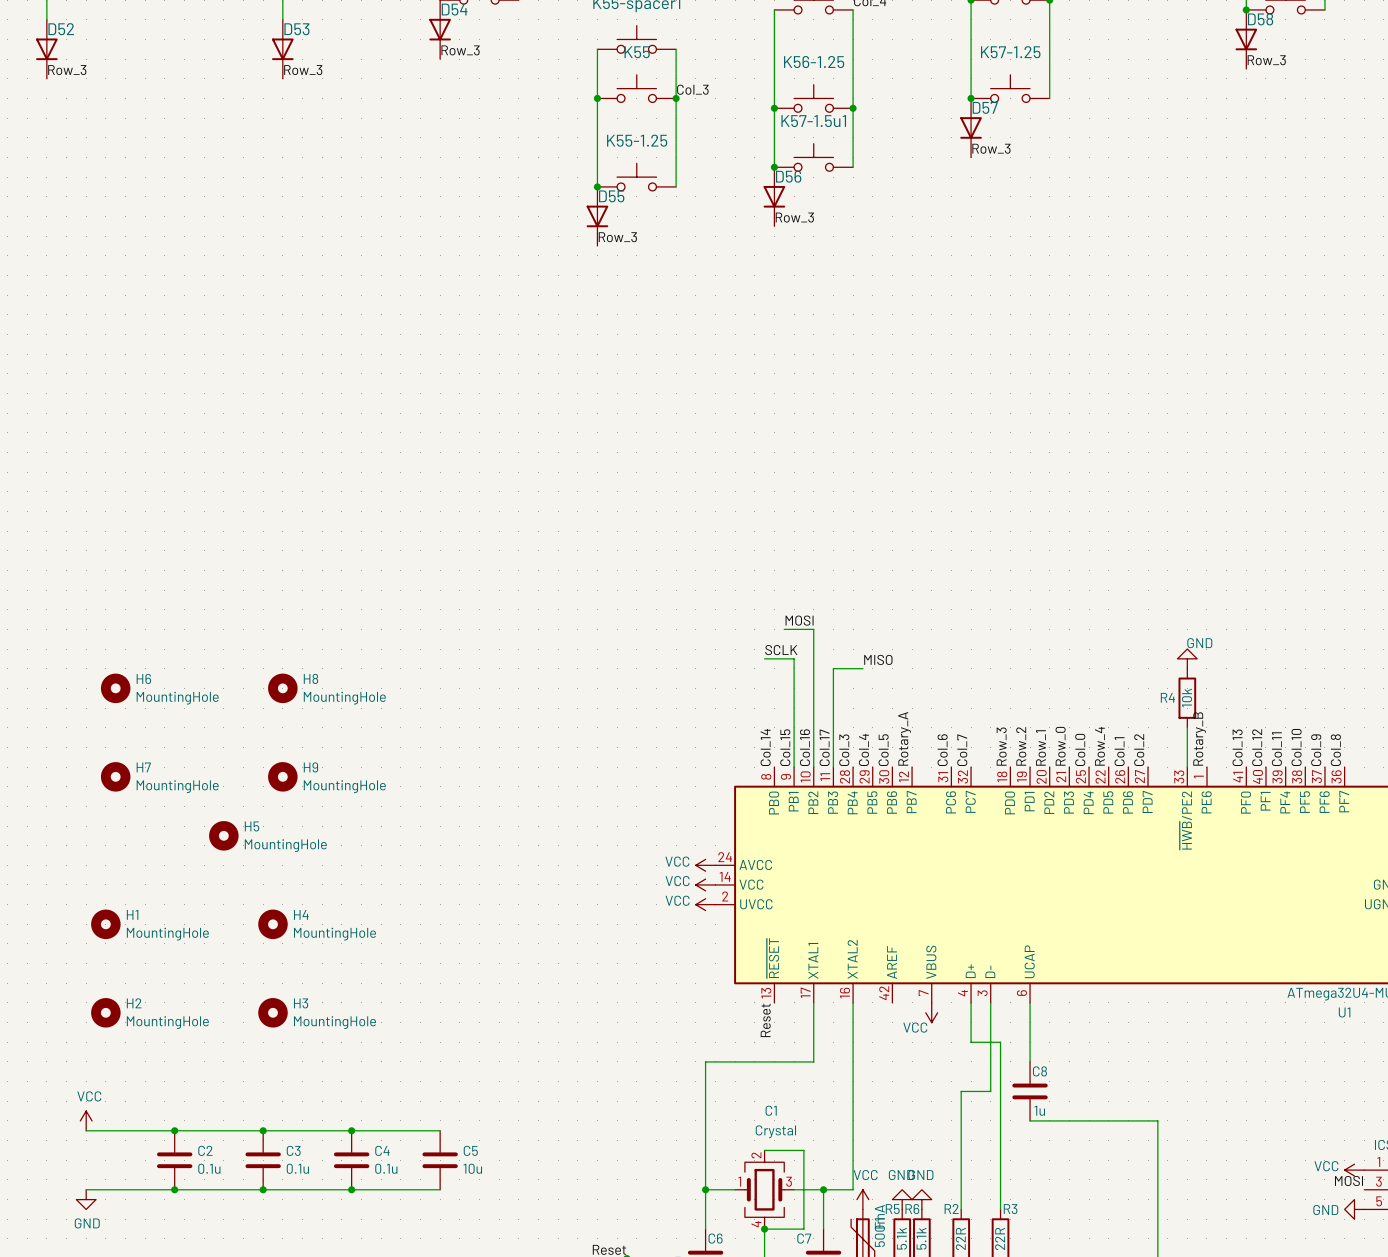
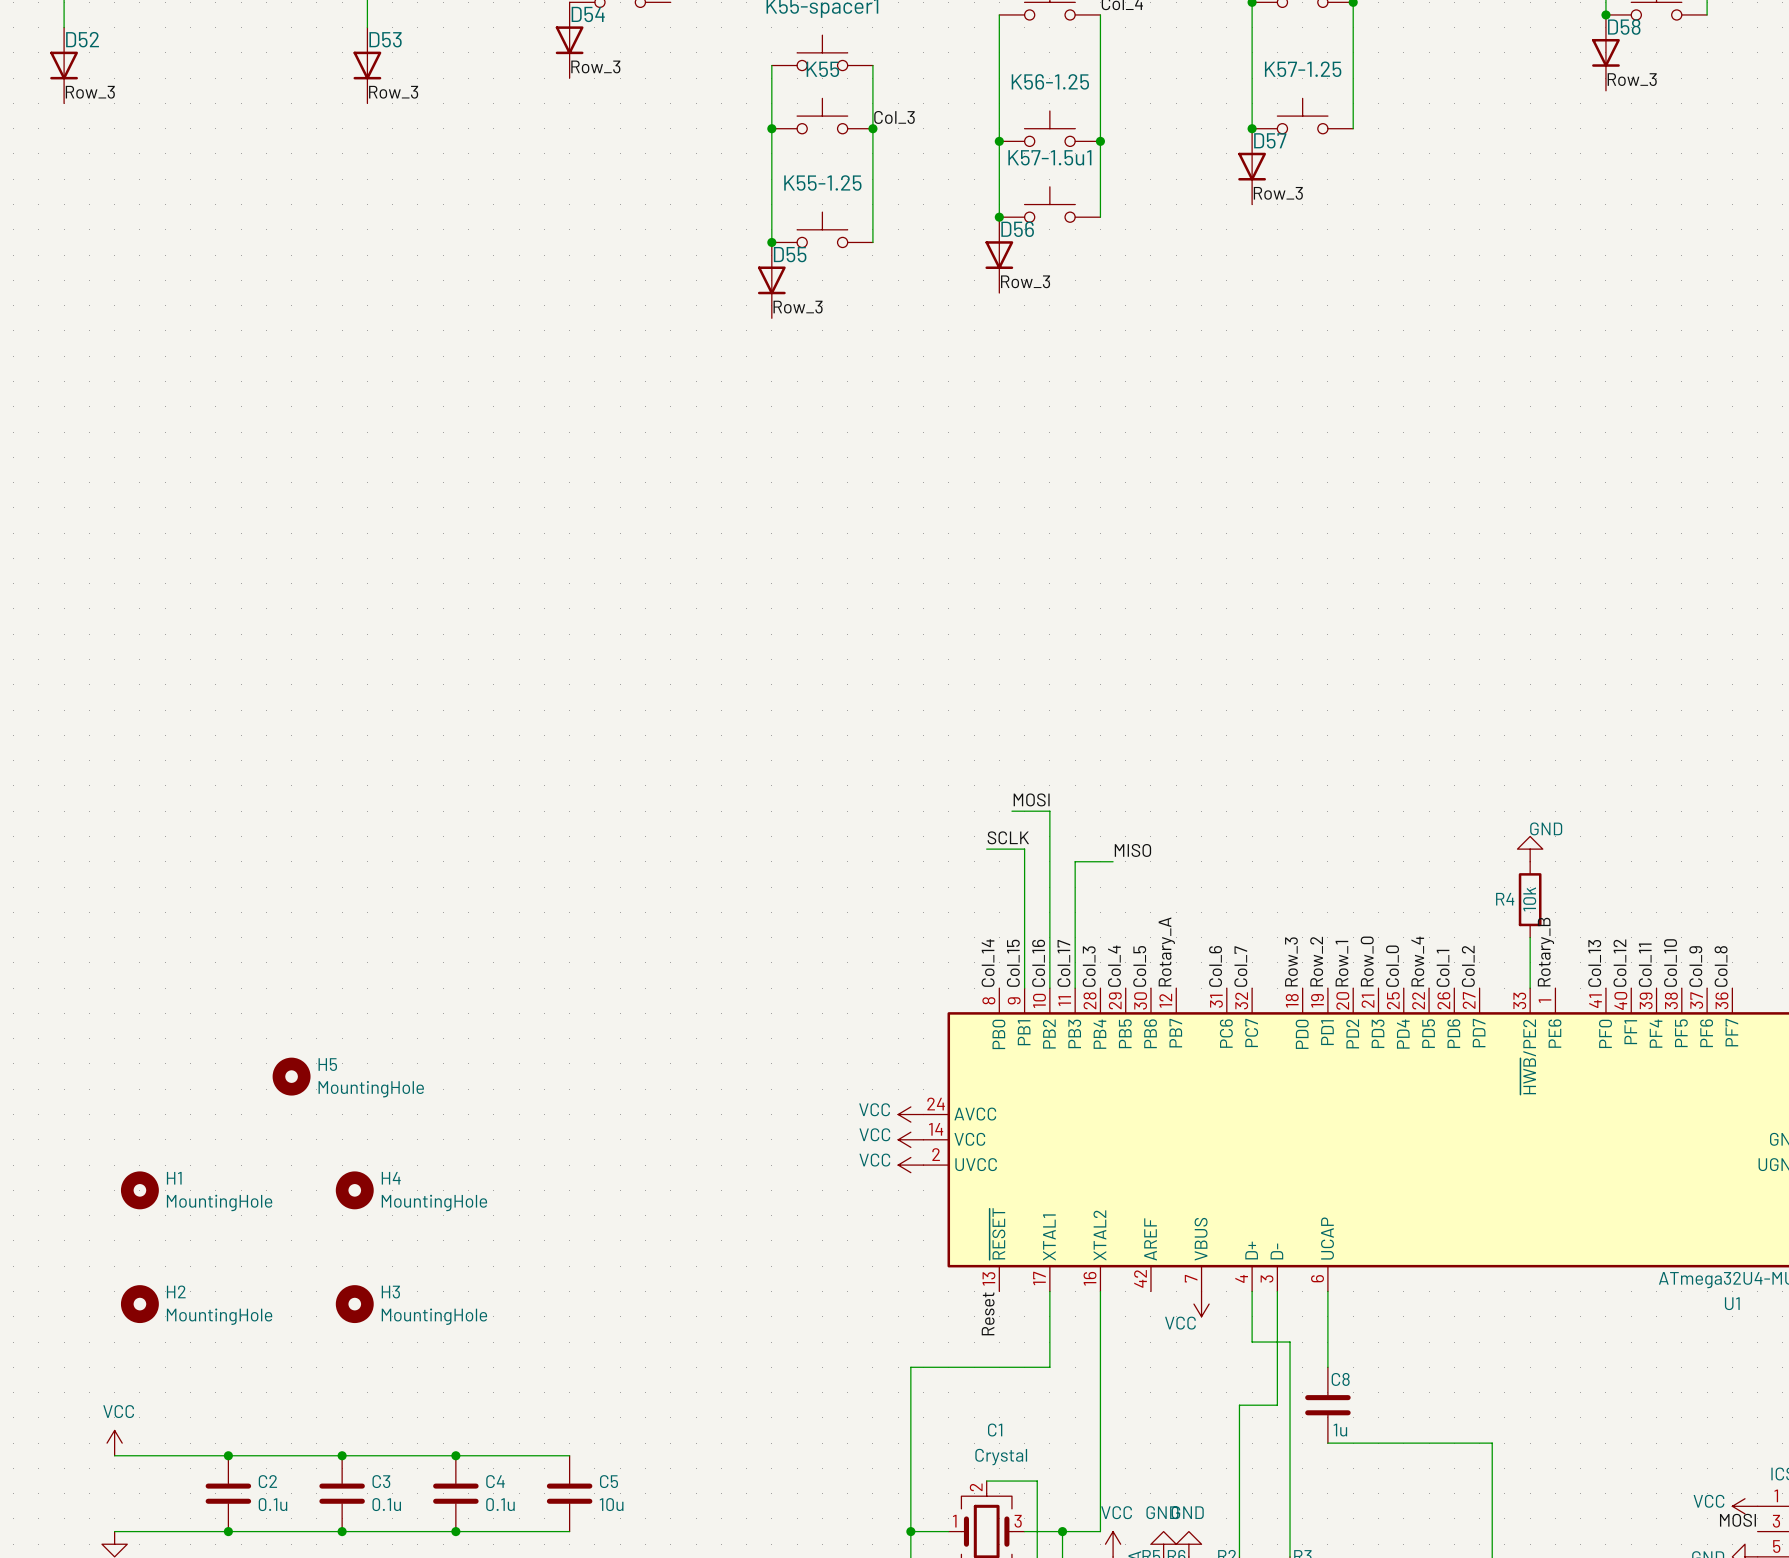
H6: MountingHole (115, 688) -> none
H8: MountingHole (282, 688) -> none
H7: MountingHole (115, 776) -> none
H9: MountingHole (282, 776) -> none

